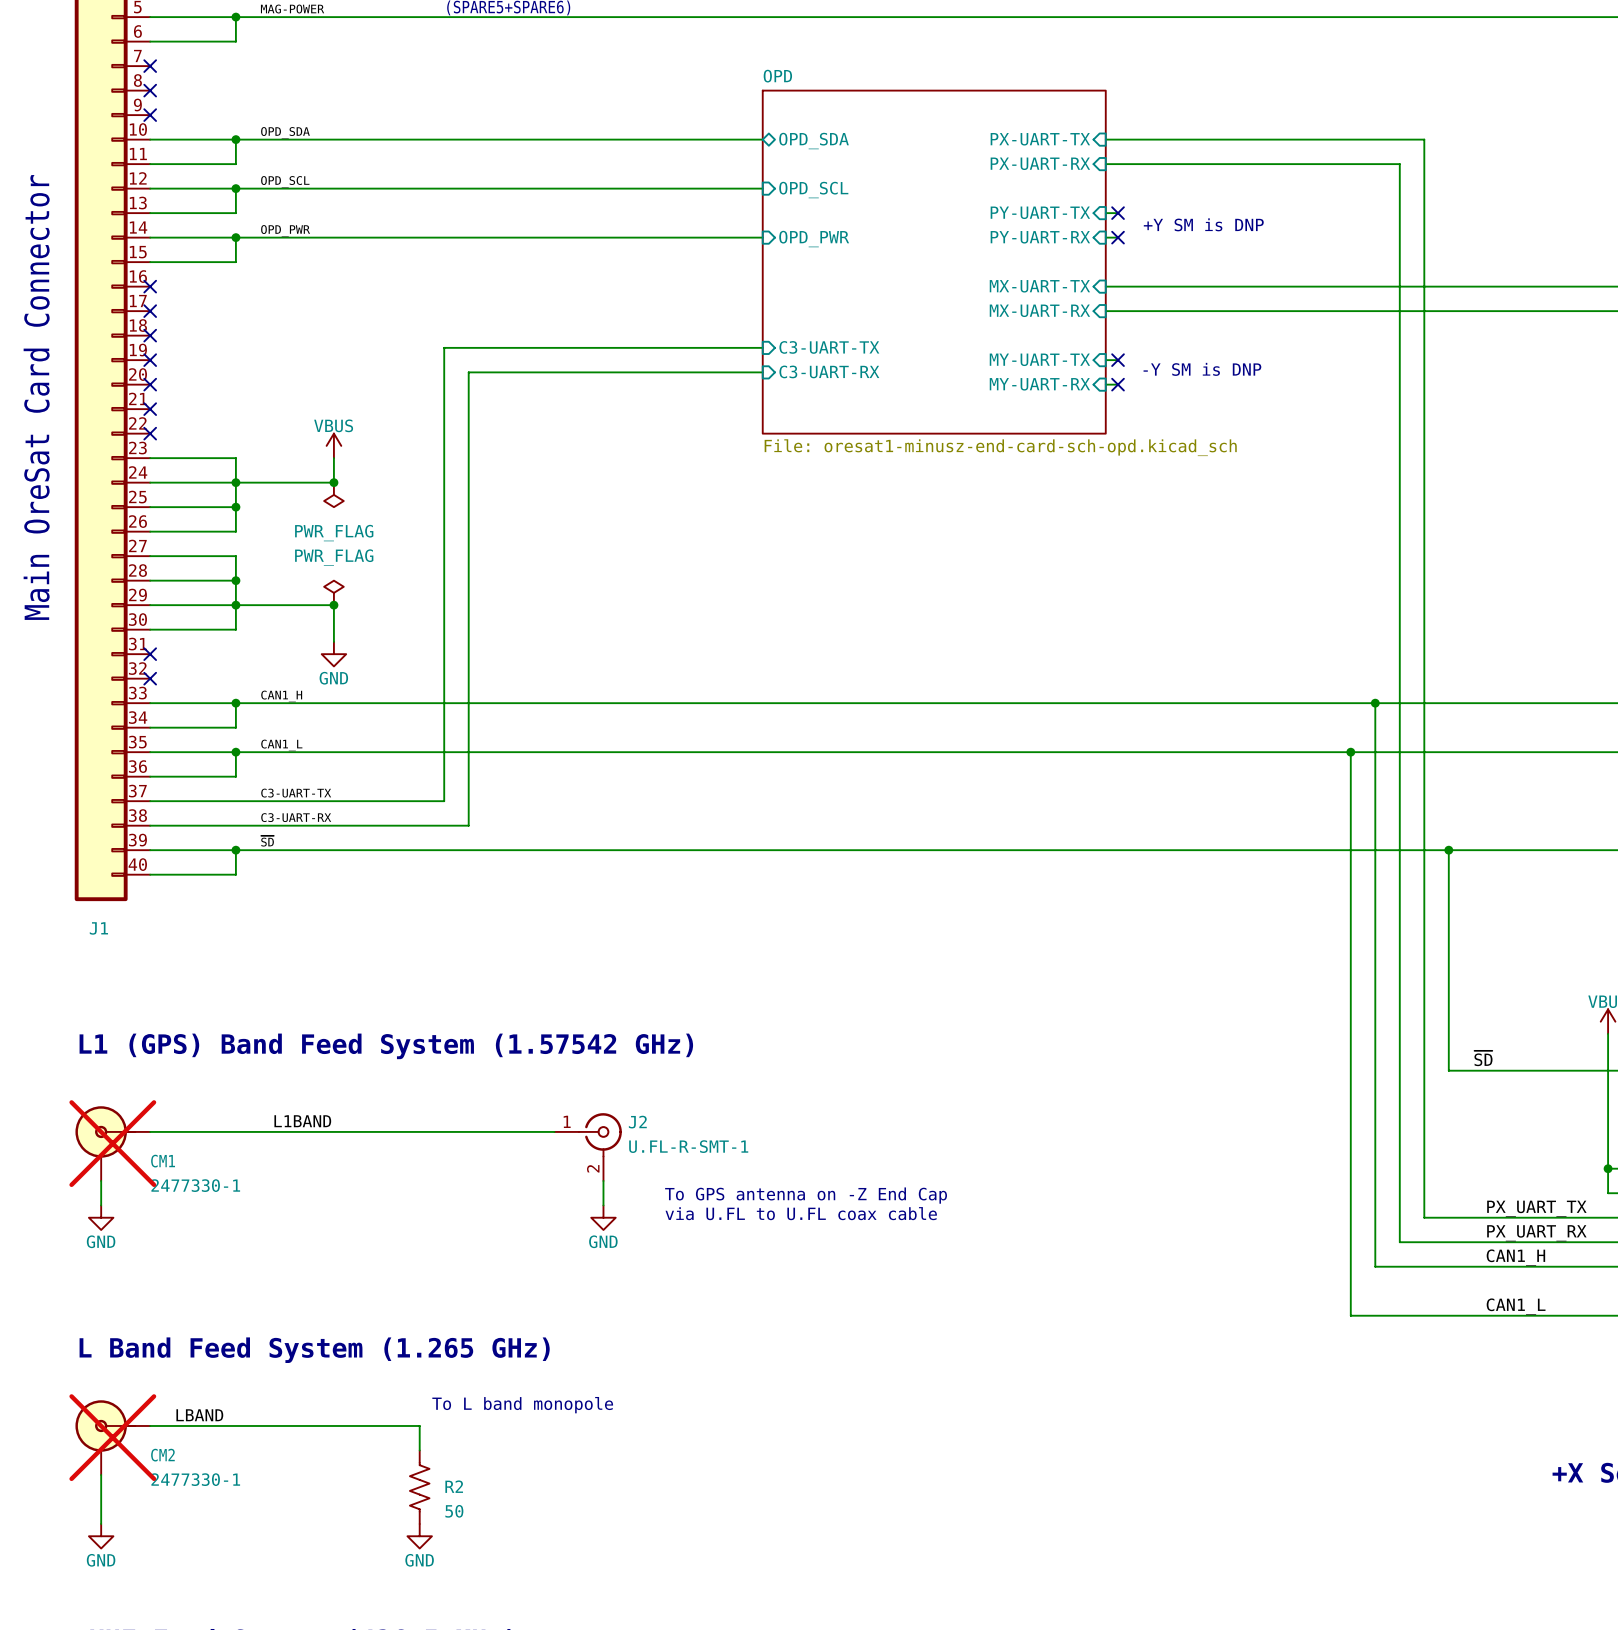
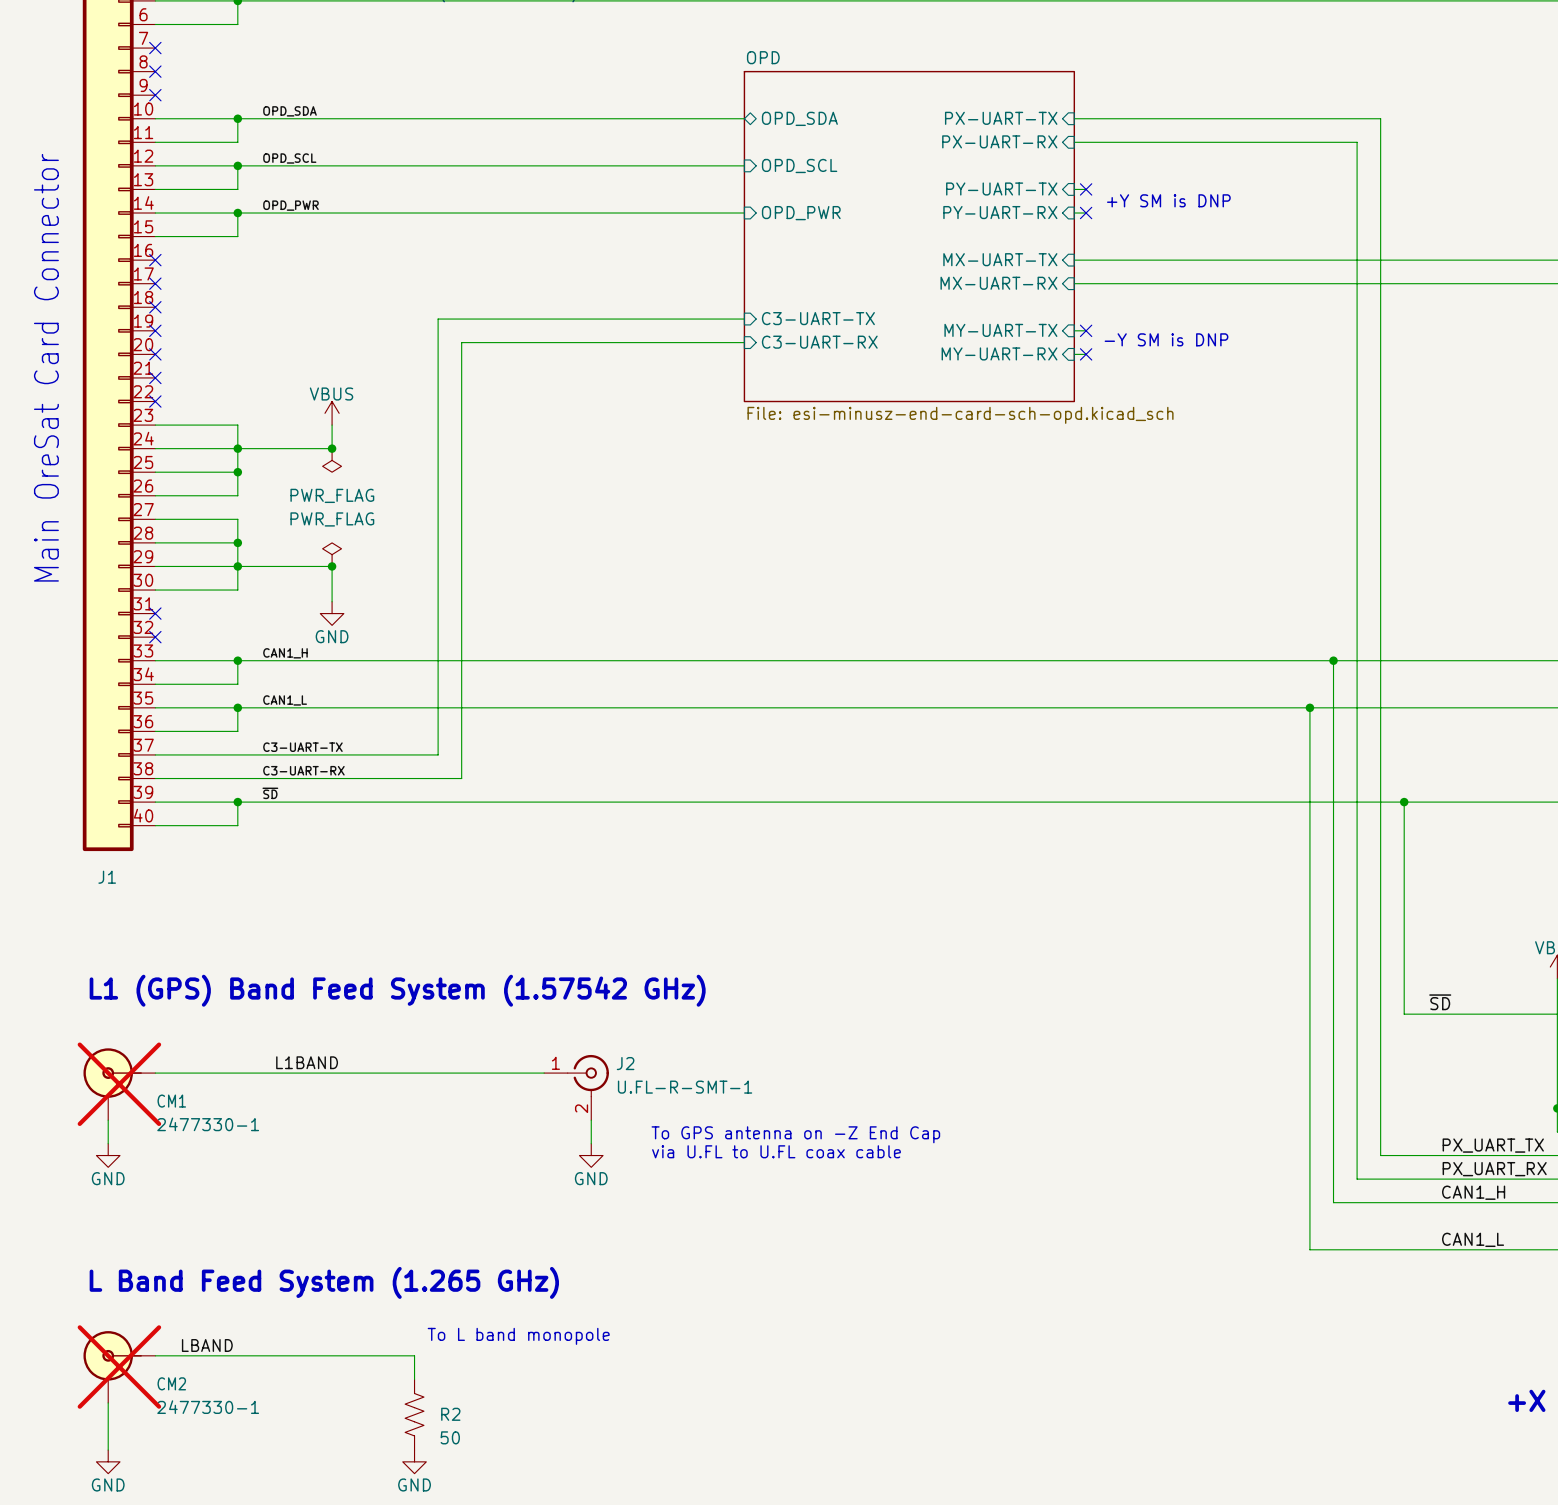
sheet OPD value: File: oresat1-minusz-end-card-sch-opd.kicad_sch (1000, 447) -> File: esi-minusz-end-card-sch-opd.kicad_sch (960, 415)

